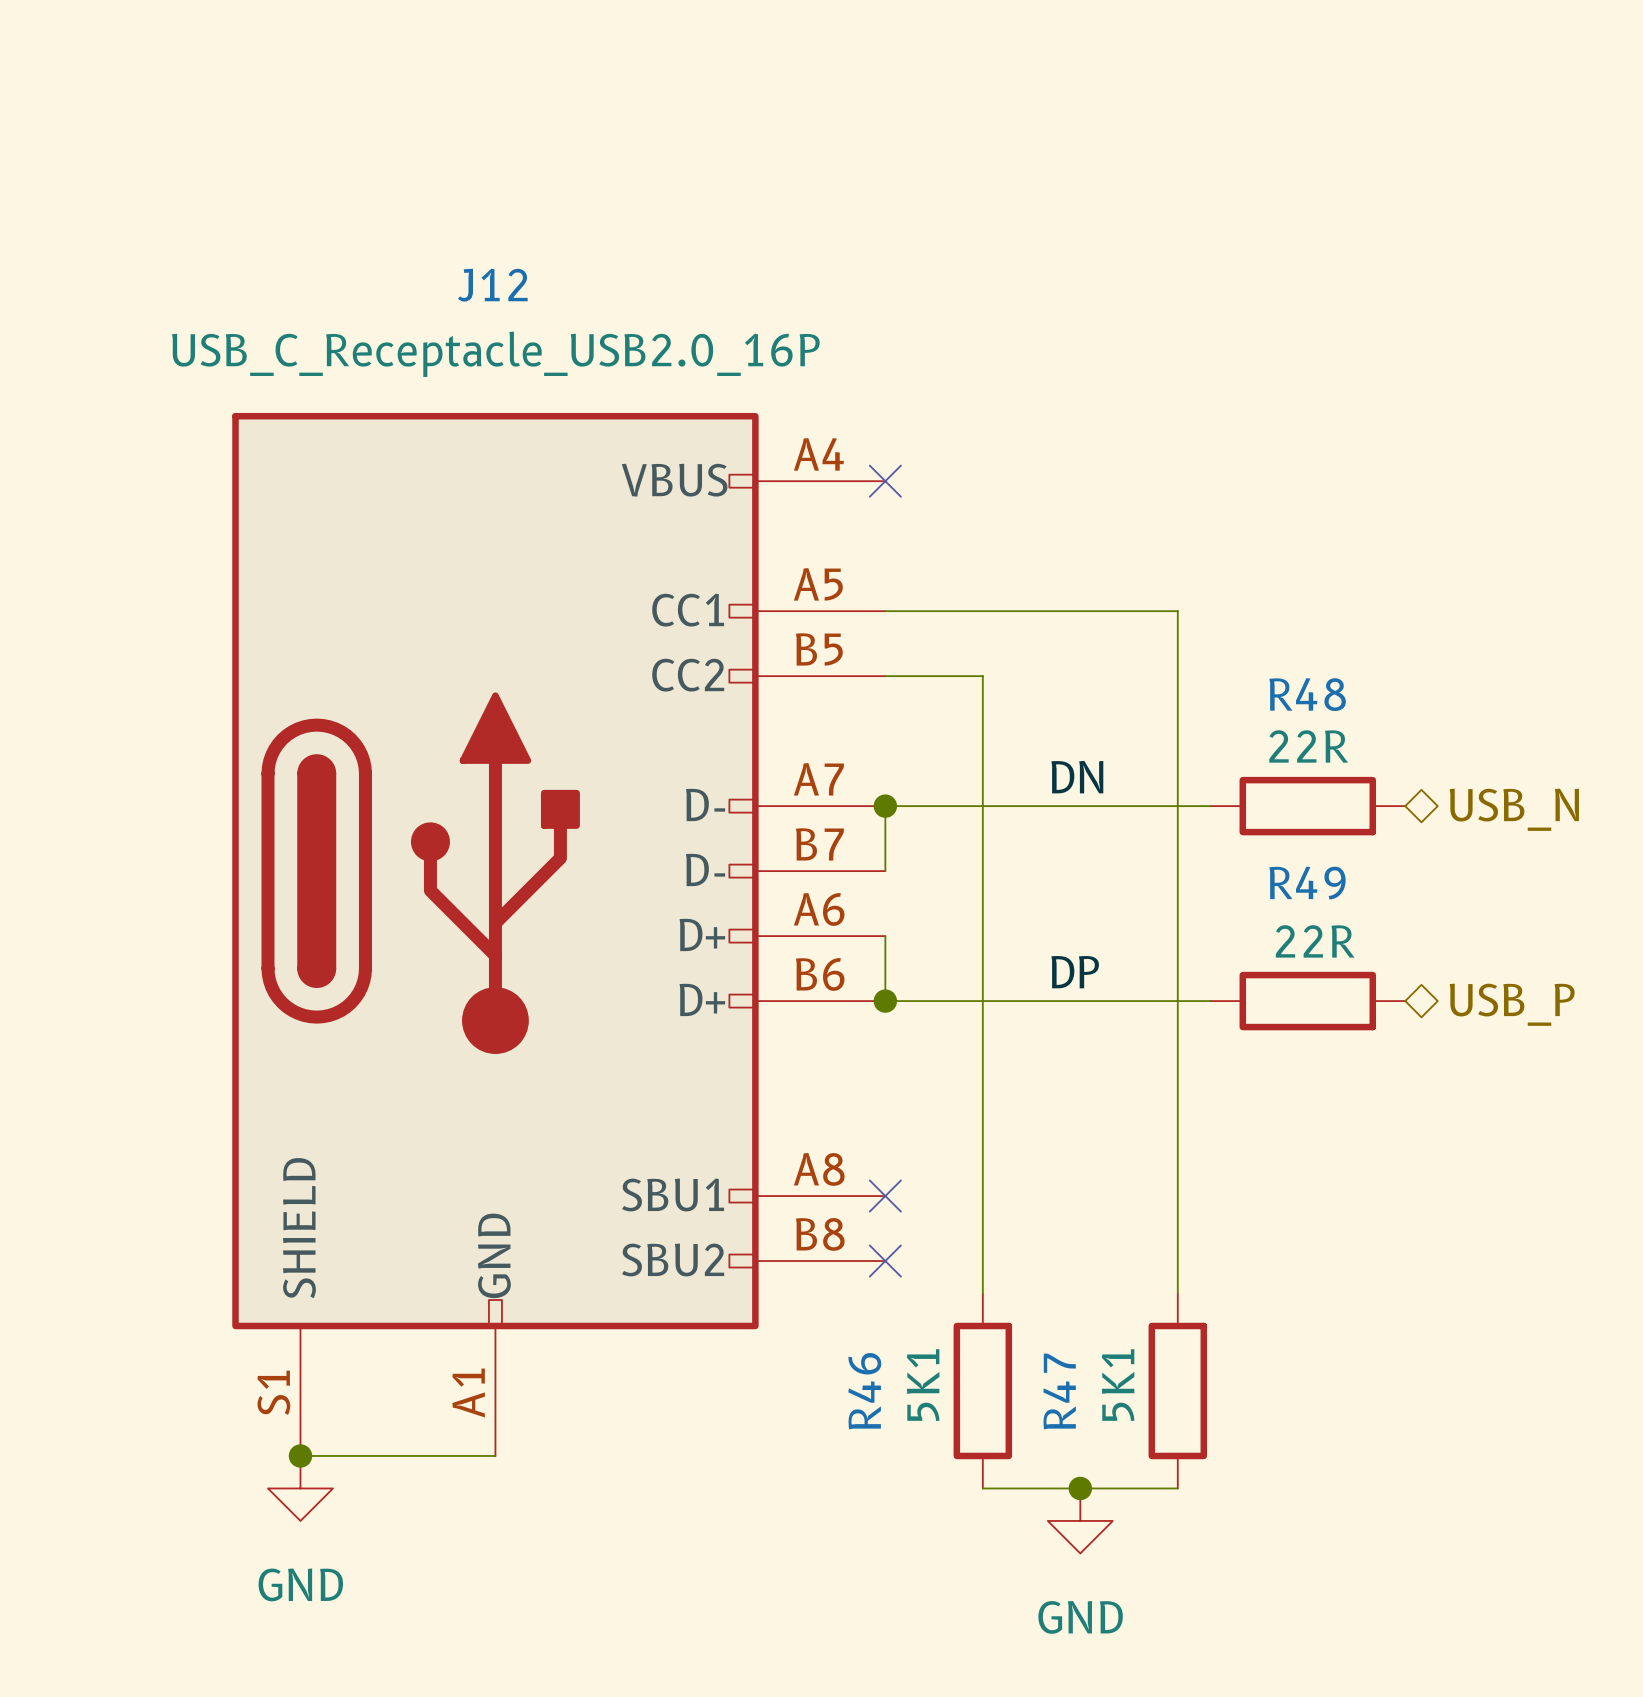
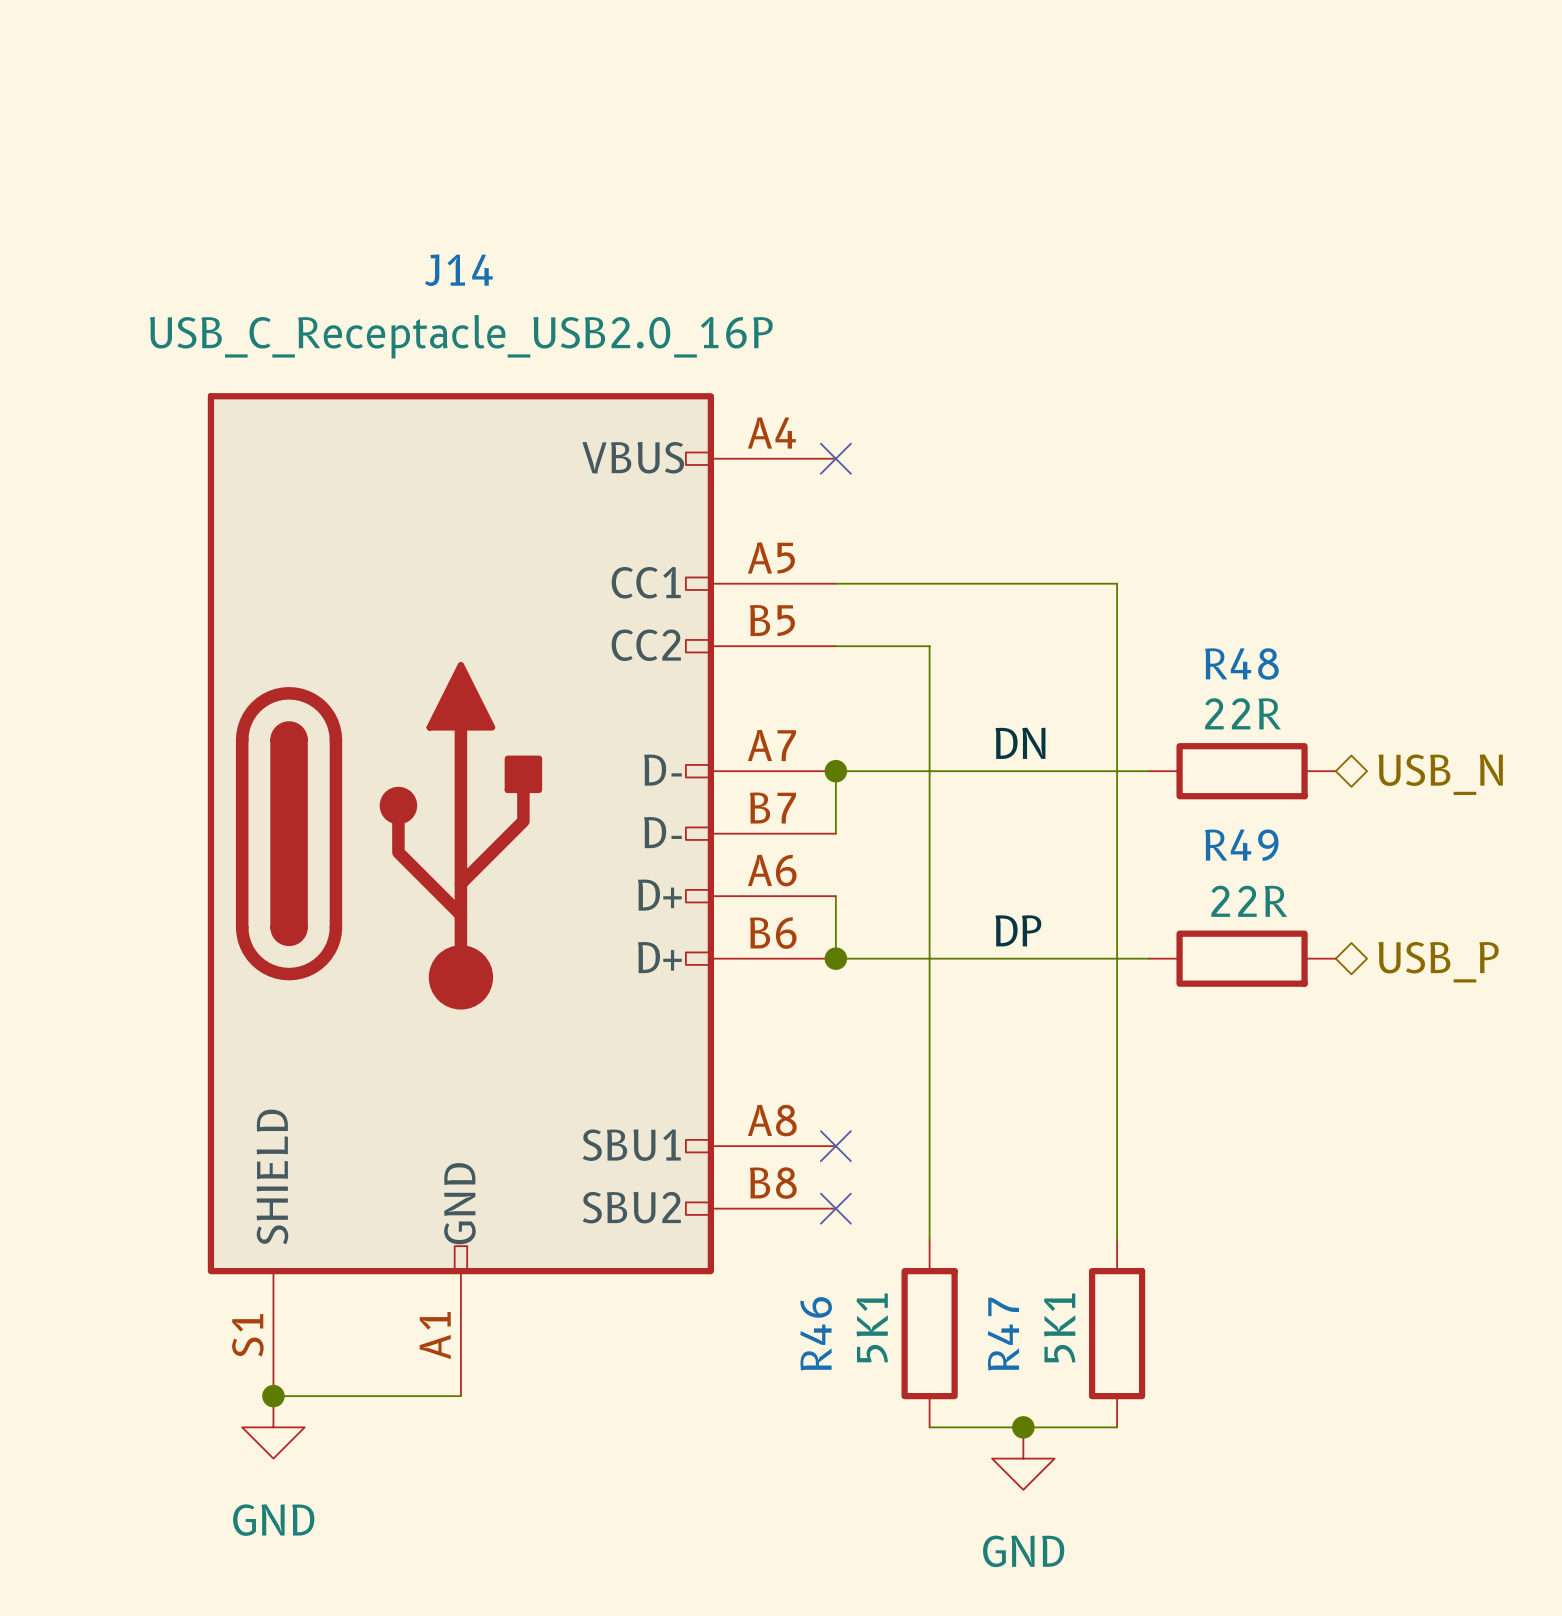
J12 name: J12 (492, 285) -> J14 (458, 270)

